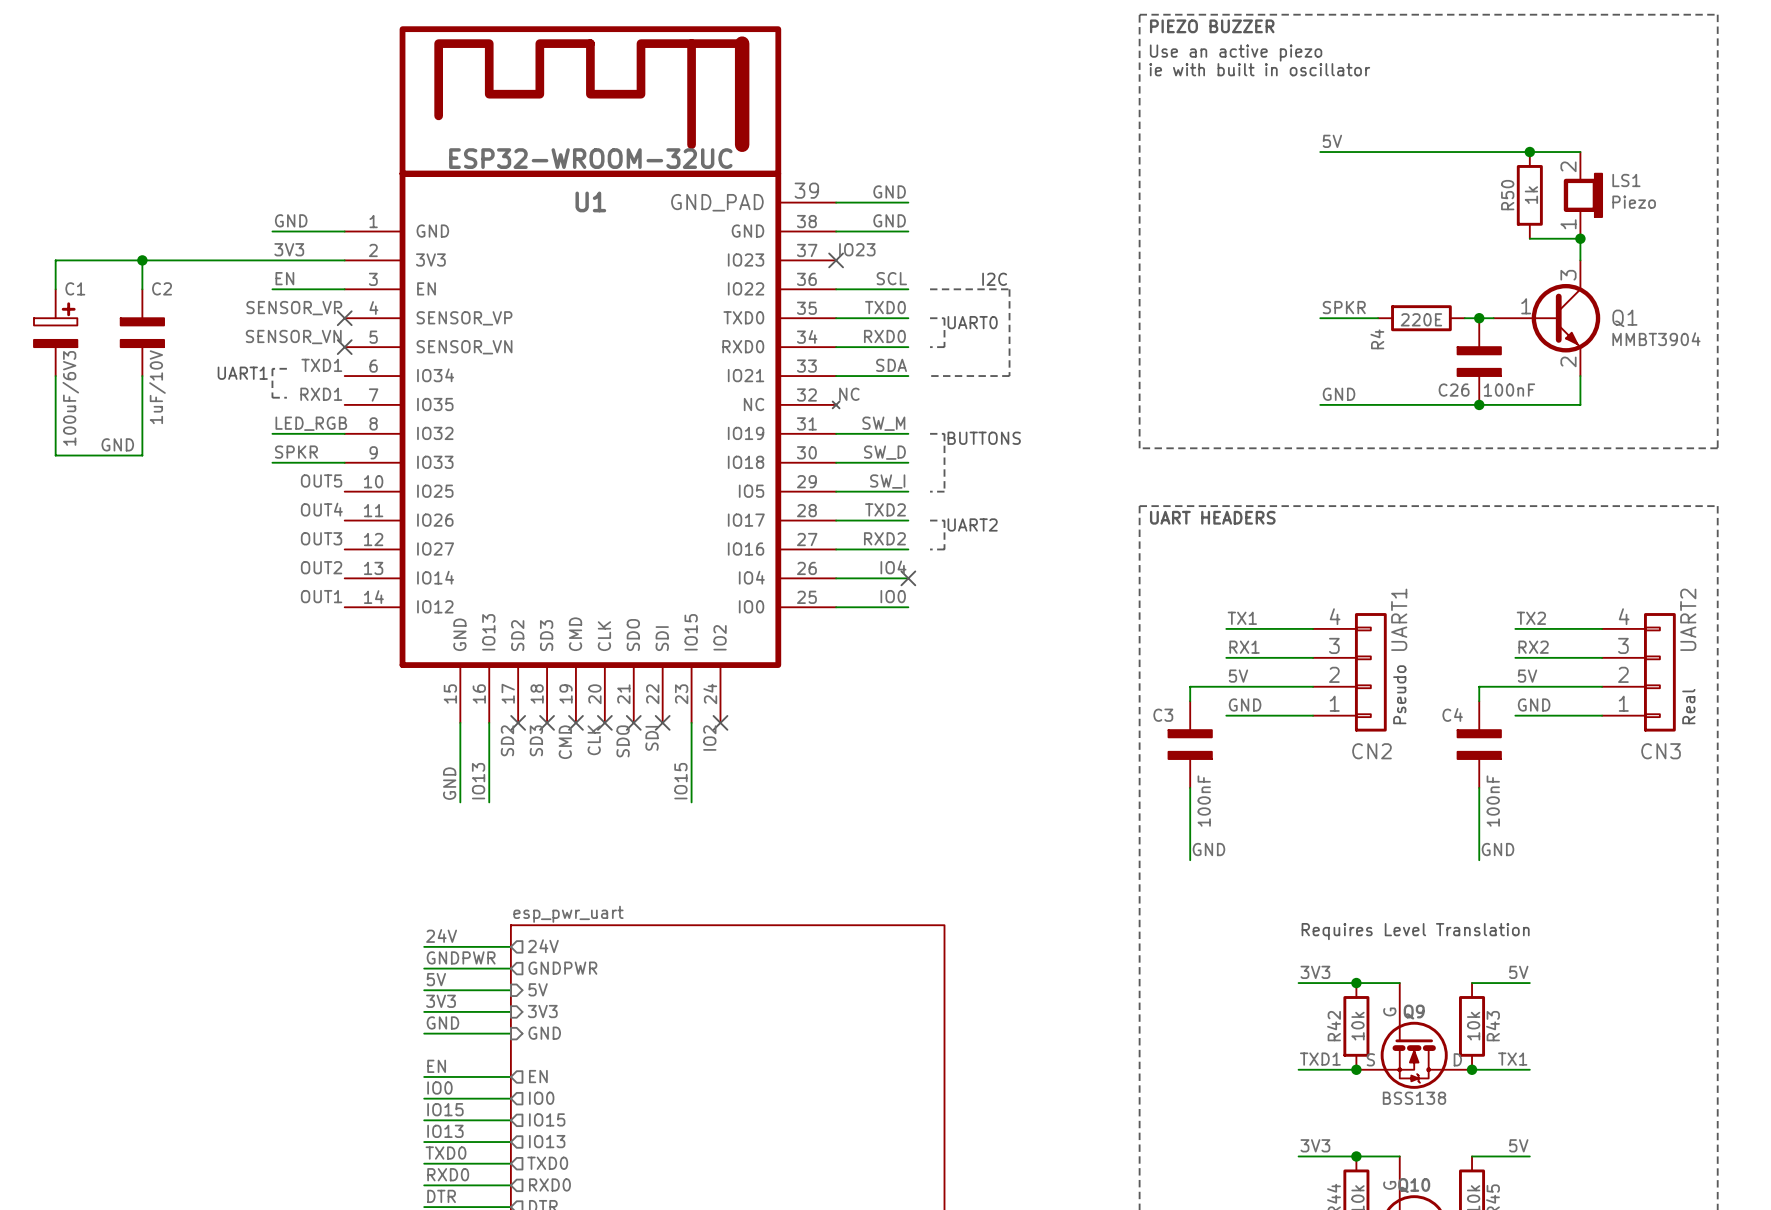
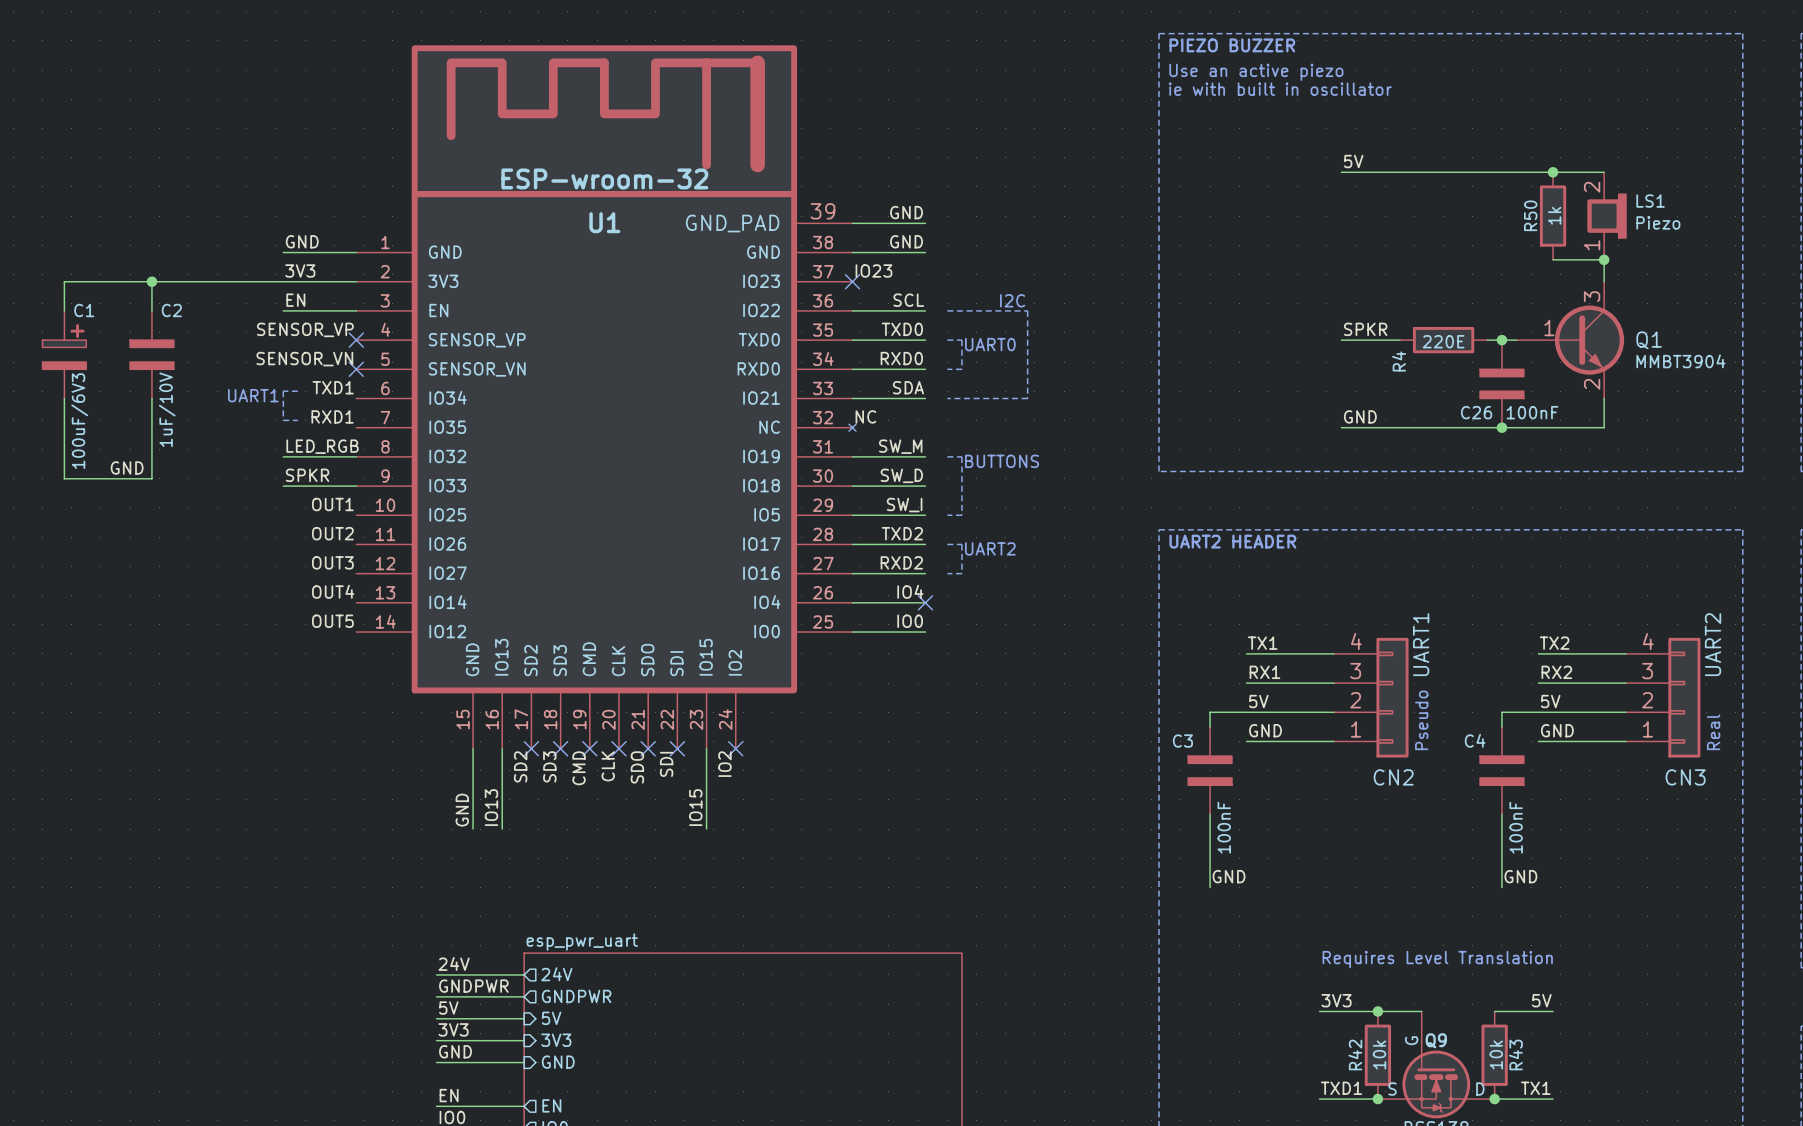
U1 value: ESP32-WROOM-32UC (590, 158) -> ESP-wroom-32 (604, 178)
label: OUT5 (321, 480) -> OUT1 (332, 504)
label: OUT4 (321, 509) -> OUT2 (332, 533)
text: UART HEADERS (1212, 517) -> UART2 HEADER (1232, 541)
label: OUT2 (321, 567) -> OUT4 (333, 591)
label: OUT1 (321, 596) -> OUT5 (332, 621)

